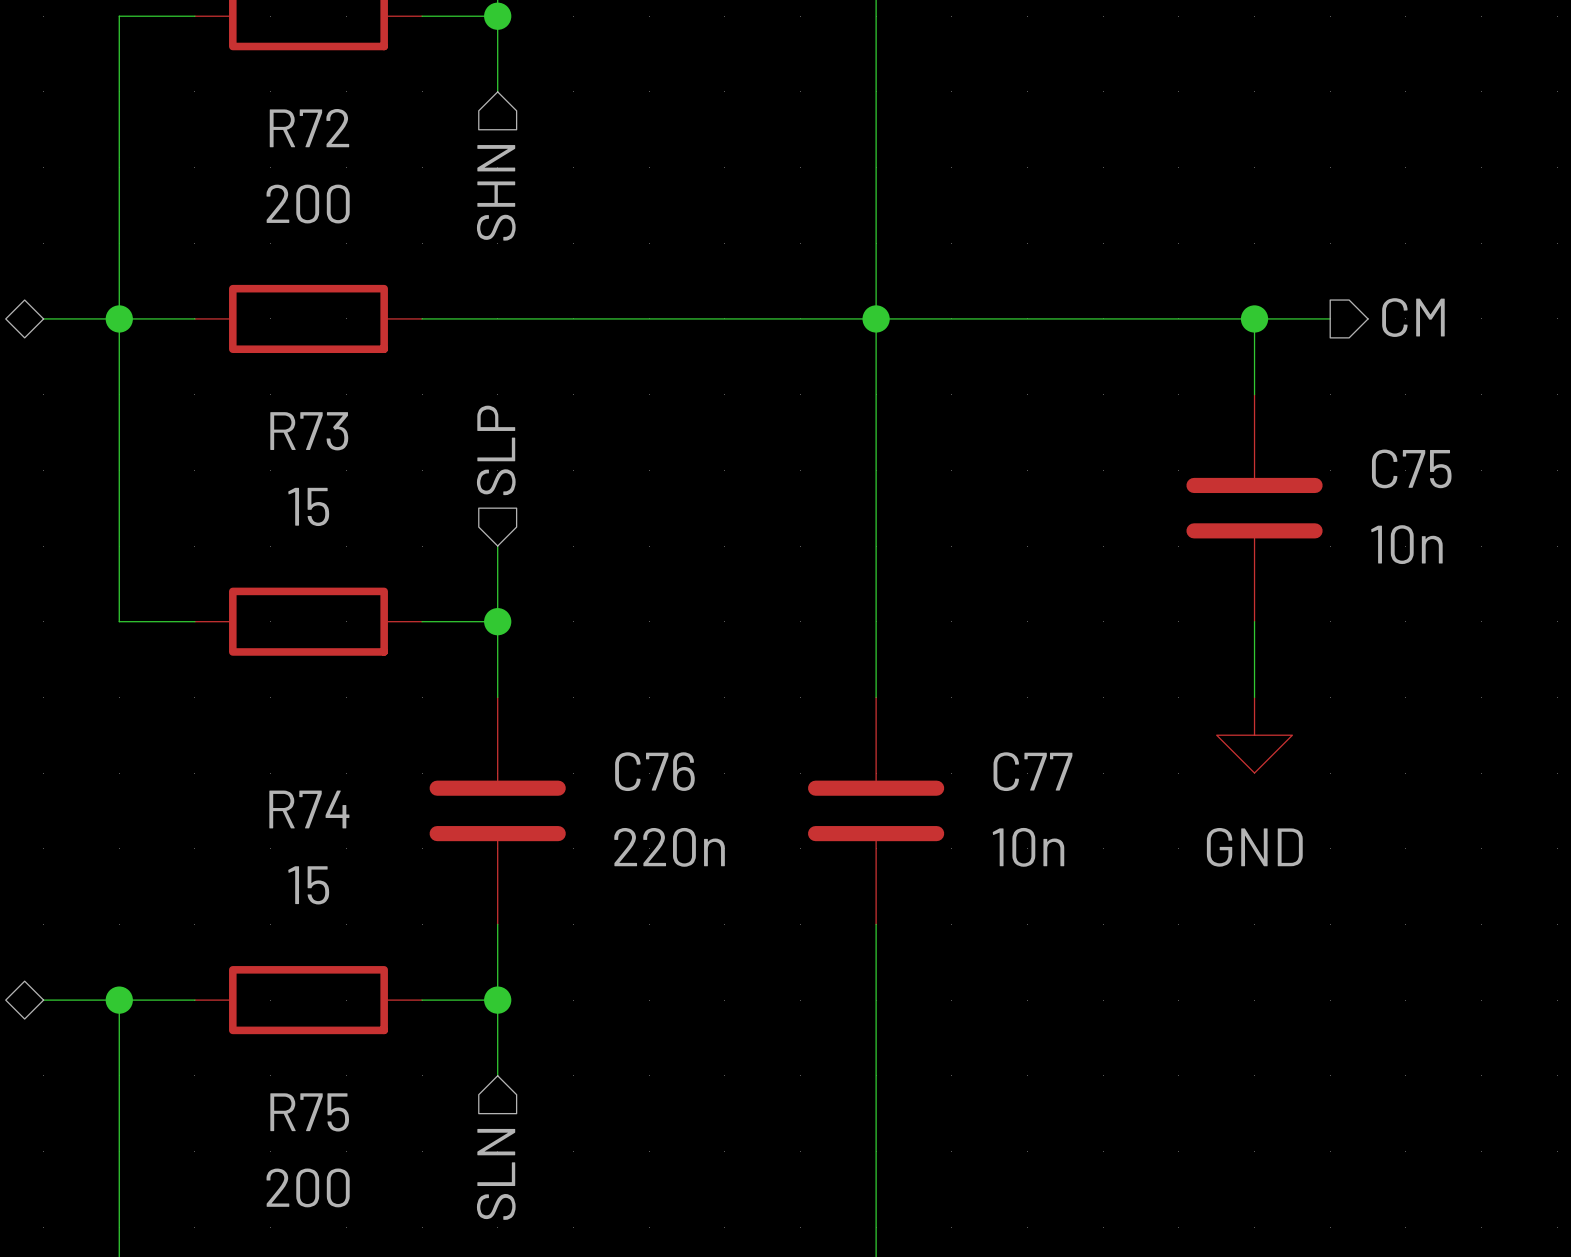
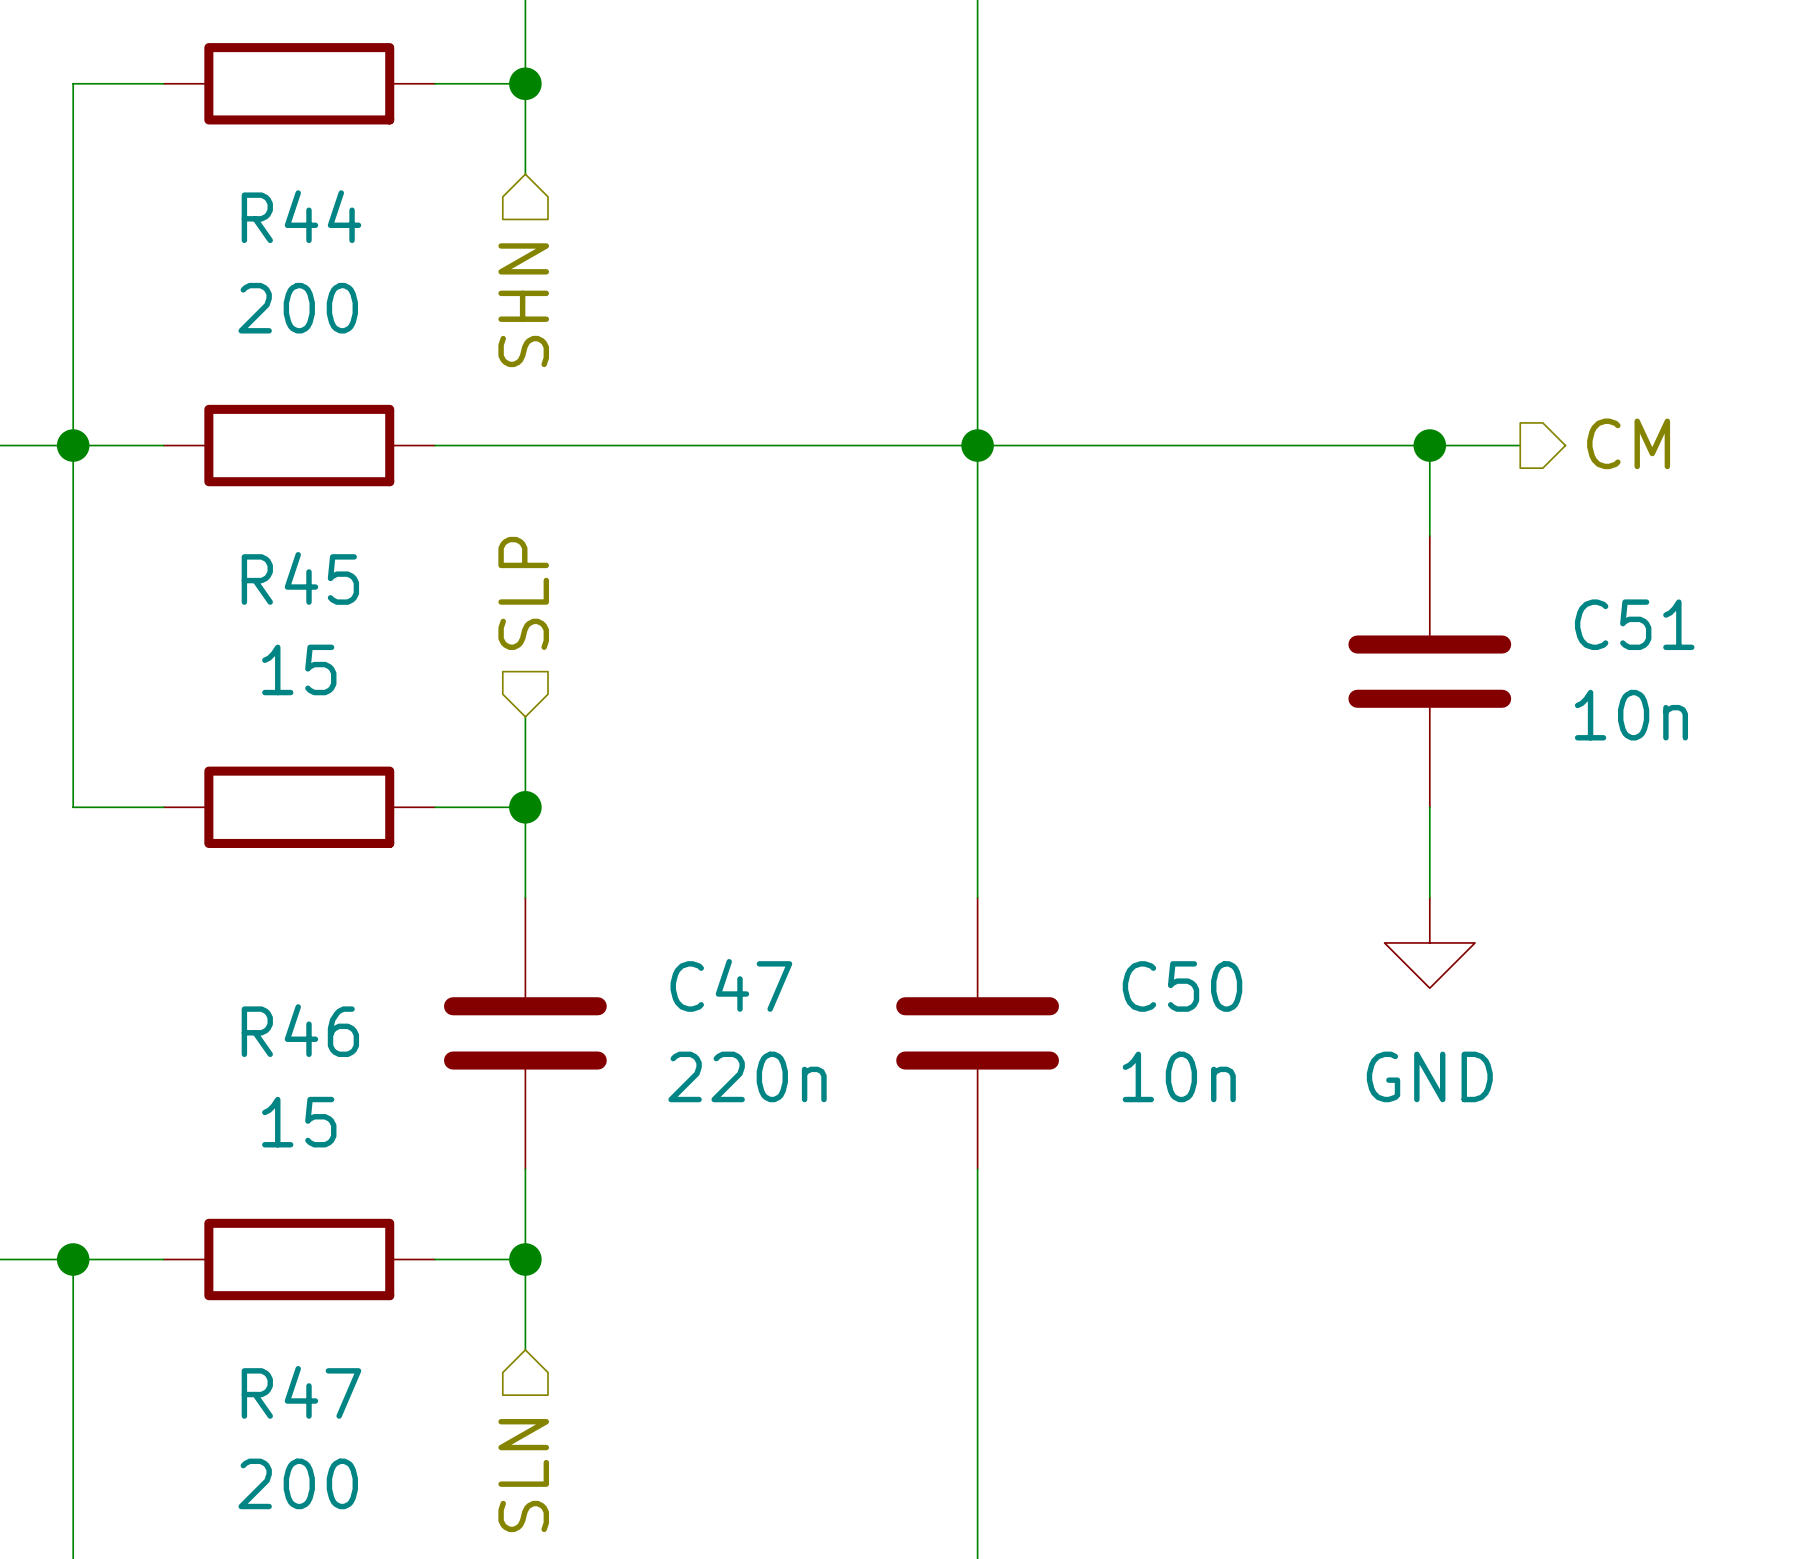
R72 name: R72 (309, 128) -> R44 (301, 216)
R73 name: R73 (309, 431) -> R45 (300, 578)
C75 name: C75 (1411, 468) -> C51 (1634, 624)
C76 name: C76 (654, 771) -> C47 (731, 985)
C77 name: C77 (1032, 771) -> C50 (1182, 986)
R74 name: R74 (309, 809) -> R46 (300, 1030)
R75 name: R75 (309, 1112) -> R47 (301, 1392)

